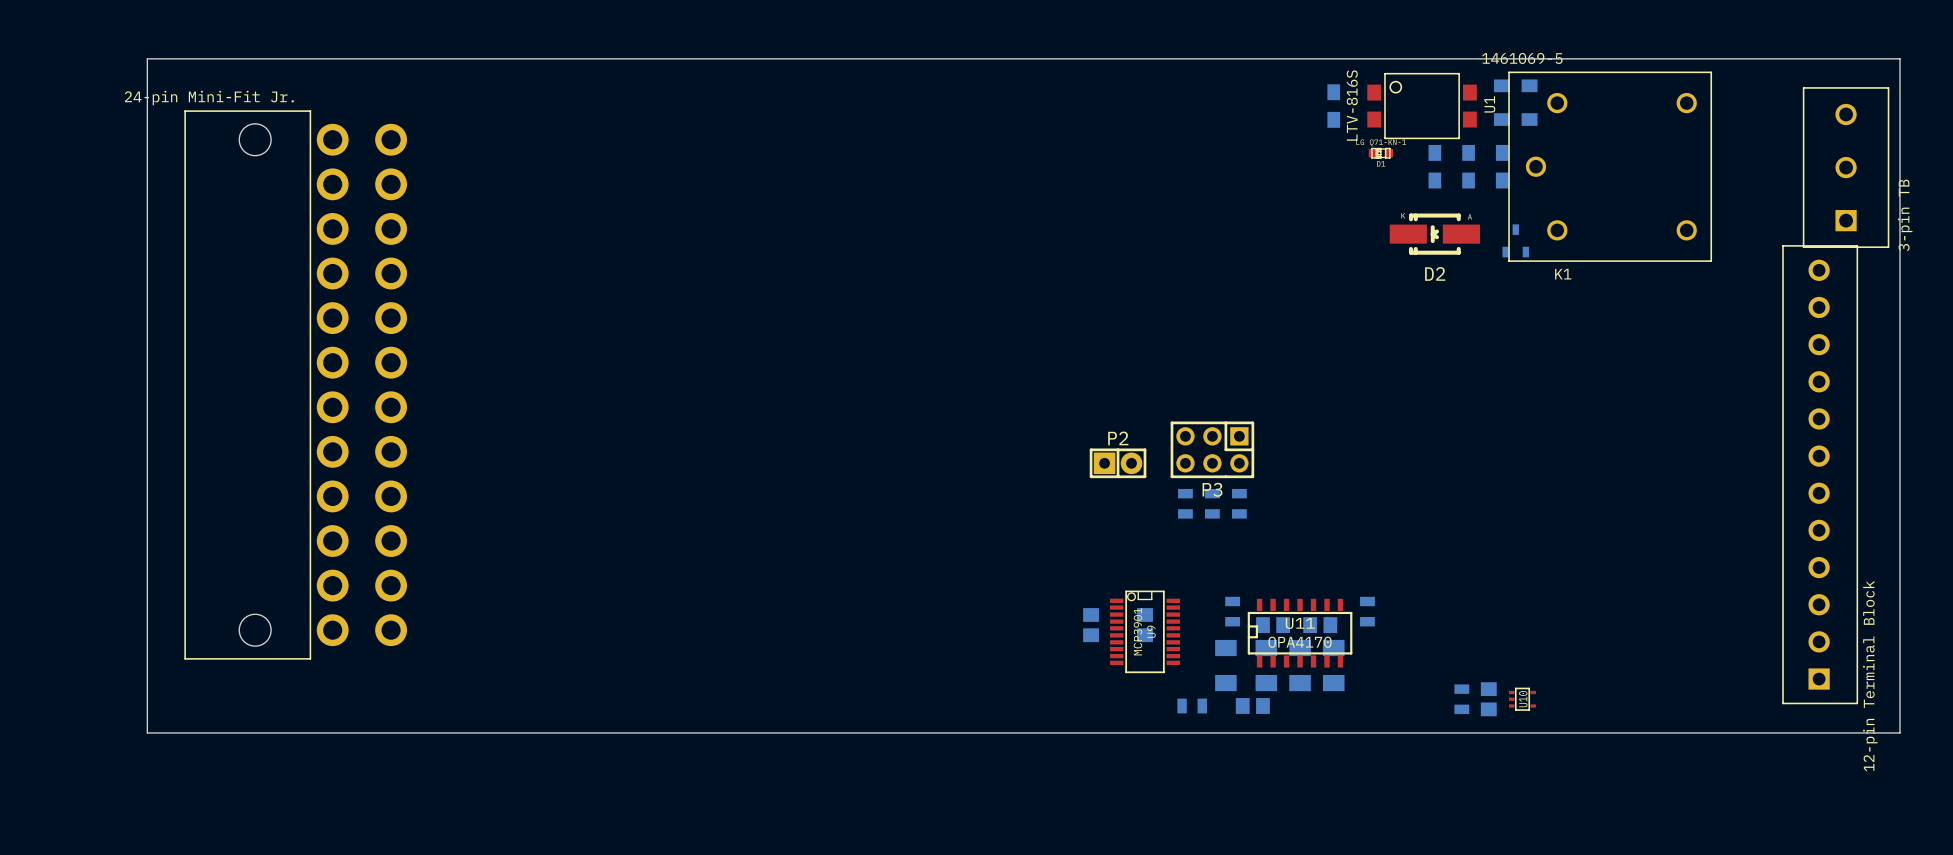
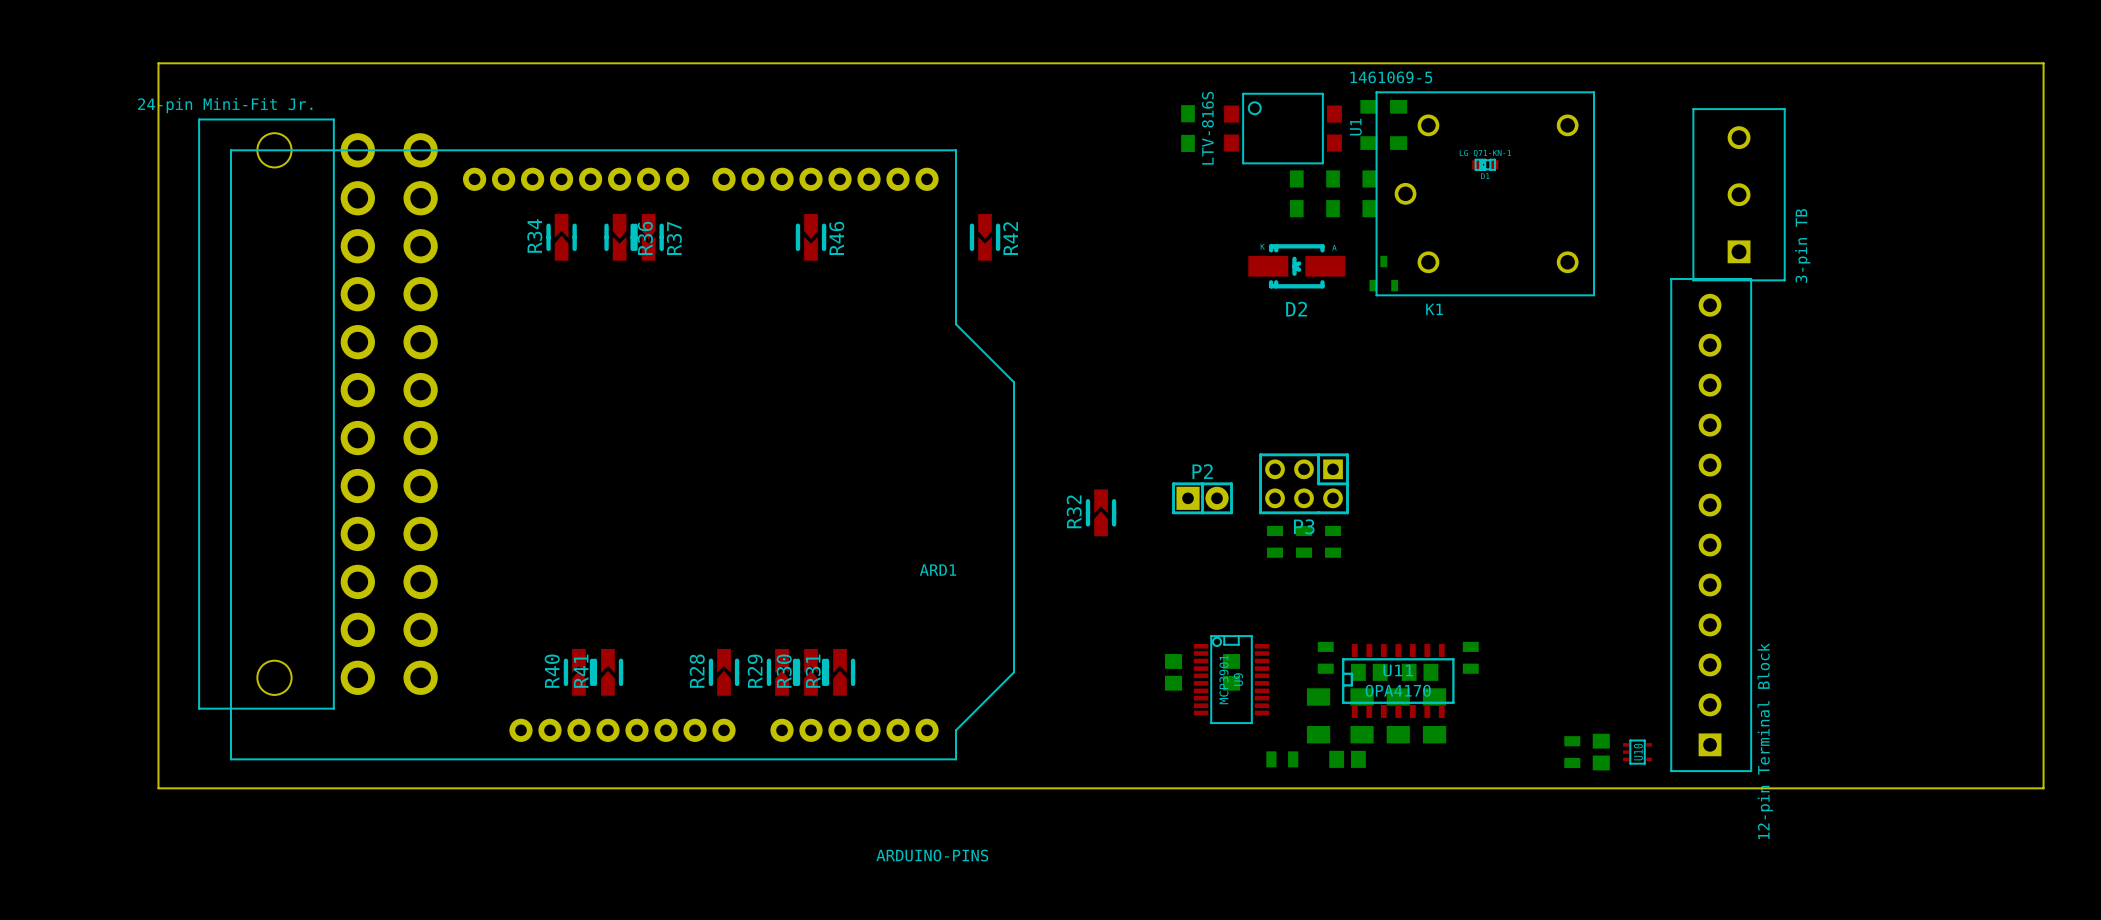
part: (1515, 85) -> none
part: none -> (1383, 106)
part: (1333, 106) -> none
U1 position: (1422, 106) -> (1283, 128)
part: none -> (1188, 128)
part: (1515, 119) -> none
part: none -> (1383, 143)
part: (1434, 166) -> none
part: (1468, 166) -> none
part: (1502, 166) -> none
K1 position: (1610, 166) -> (1485, 193)
part position: (1846, 167) -> (1739, 194)
part: none -> (1296, 193)
part: none -> (1333, 193)
part: none -> (1369, 193)
R34: none -> (561, 237)
R36: none -> (619, 237)
R37: none -> (648, 237)
R46: none -> (811, 237)
R42: none -> (985, 237)
D2 position: (1434, 234) -> (1296, 266)
part position: (1515, 240) -> (1383, 273)
ARD1: none -> ARDUINO-PINS (622, 454)
part position: (1820, 474) -> (1711, 525)
R32: none -> (1101, 512)
R40: none -> (578, 672)
R41: none -> (607, 672)
R28: none -> (724, 672)
R29: none -> (782, 672)
R30: none -> (811, 672)
R31: none -> (840, 672)

